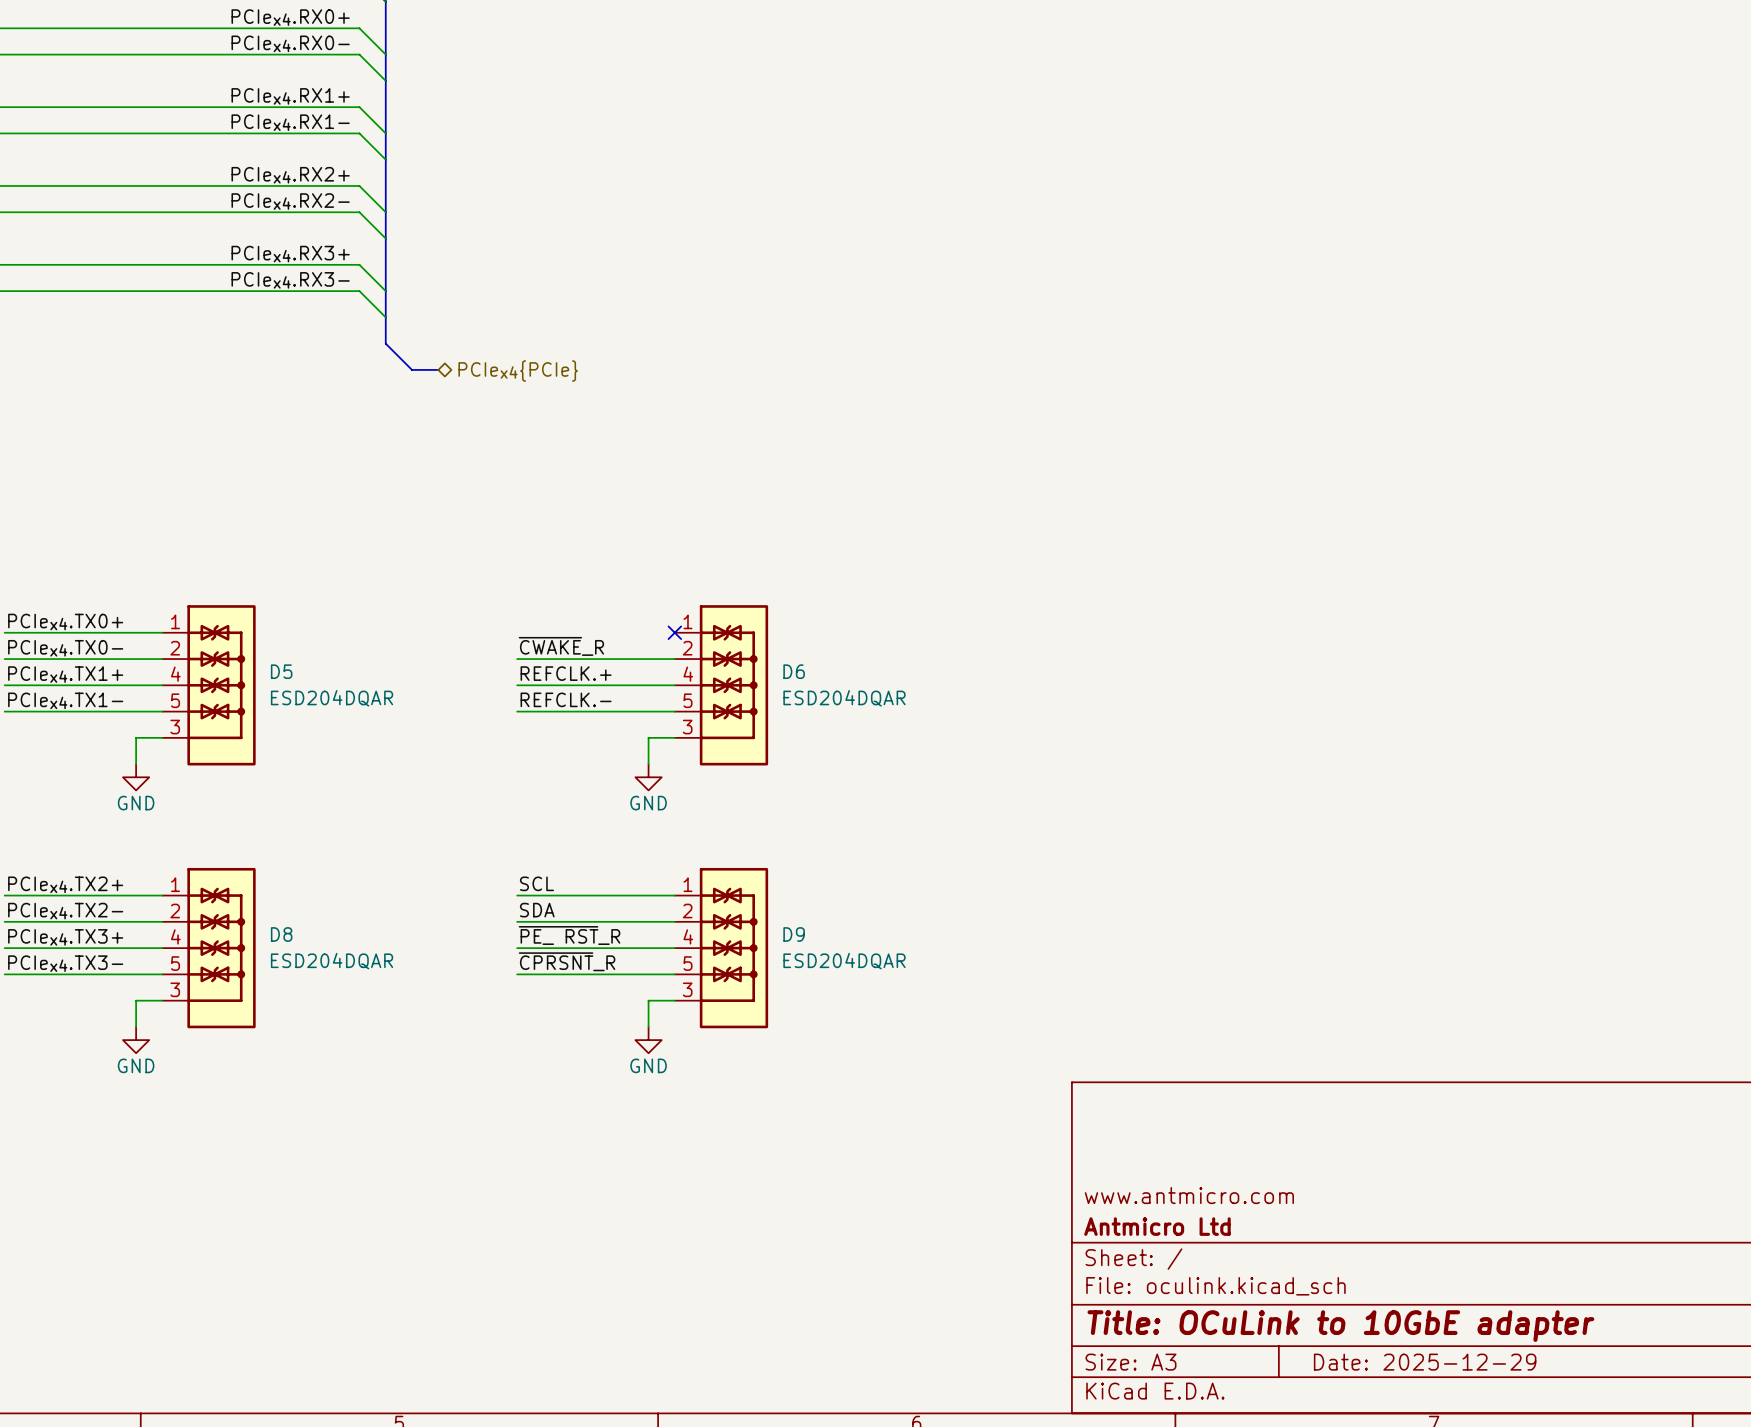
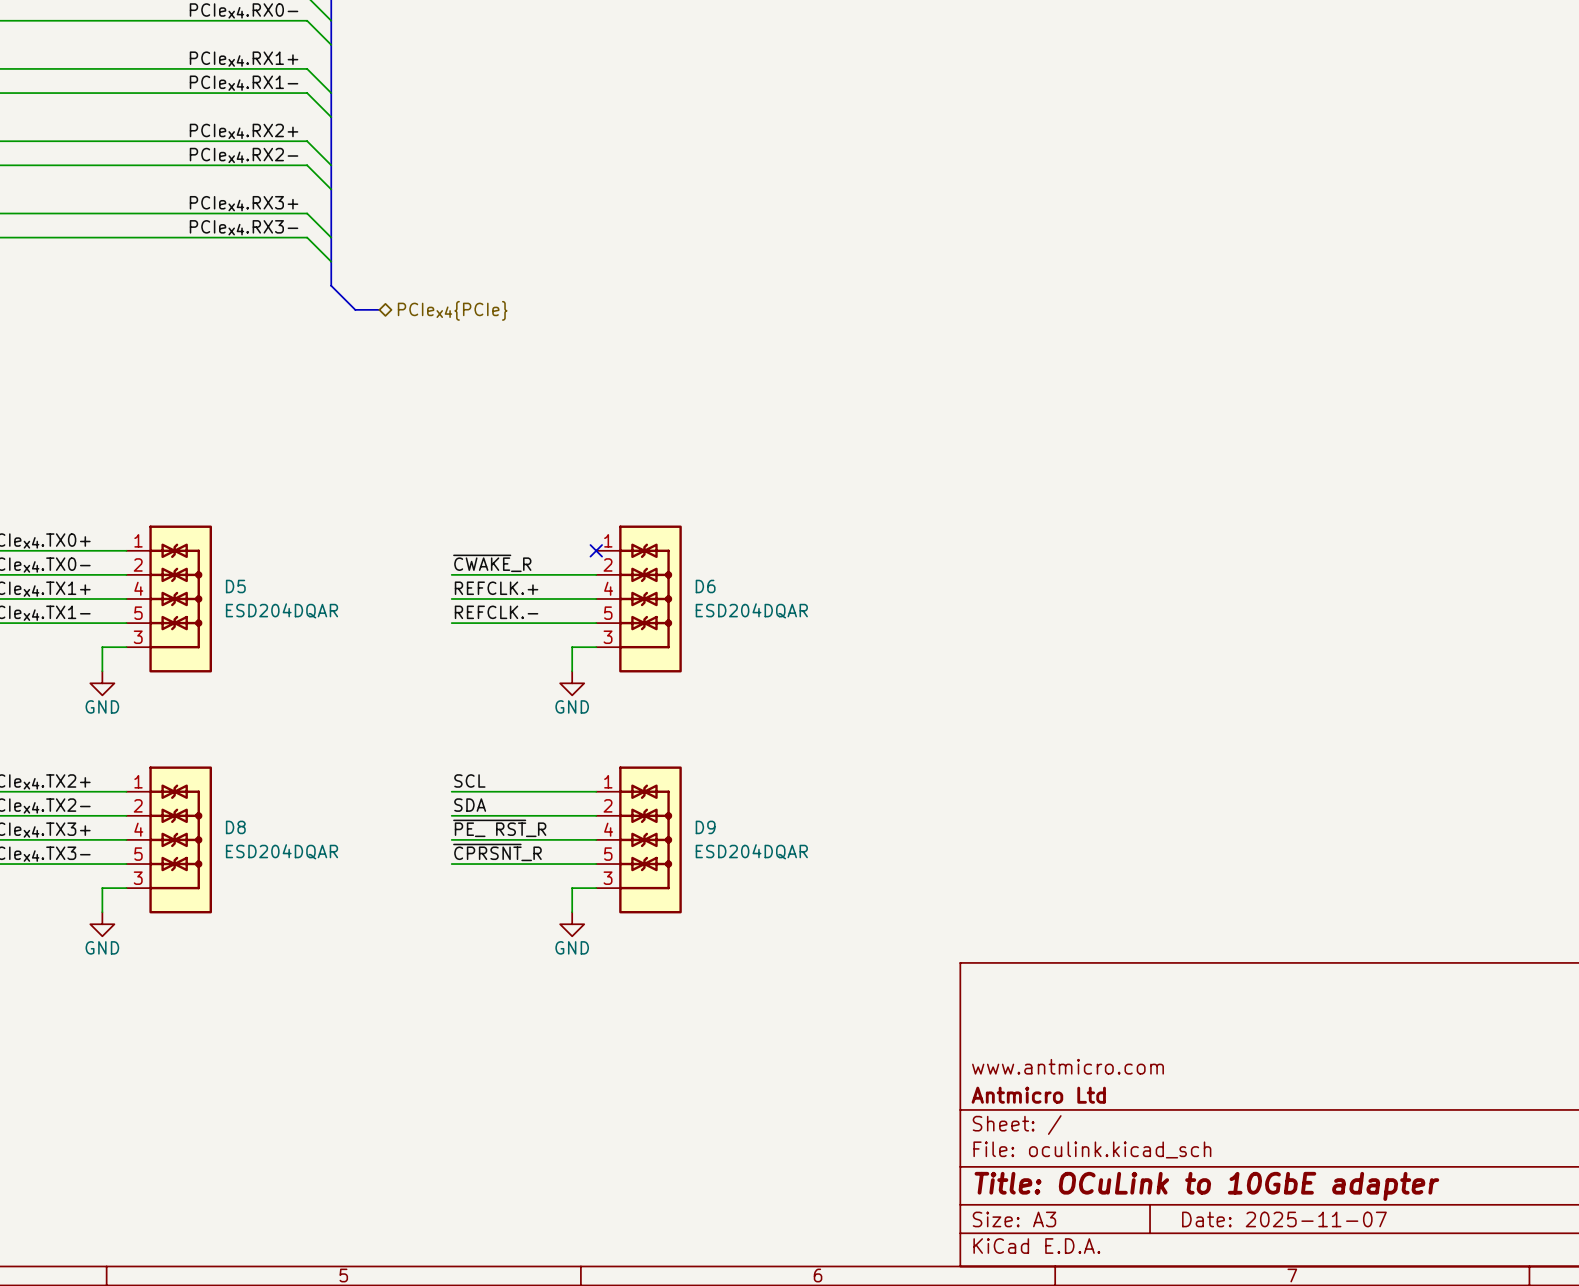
title block: Date: 2025-12-29 (1425, 1362) -> Date: 2025-11-07 (1284, 1219)

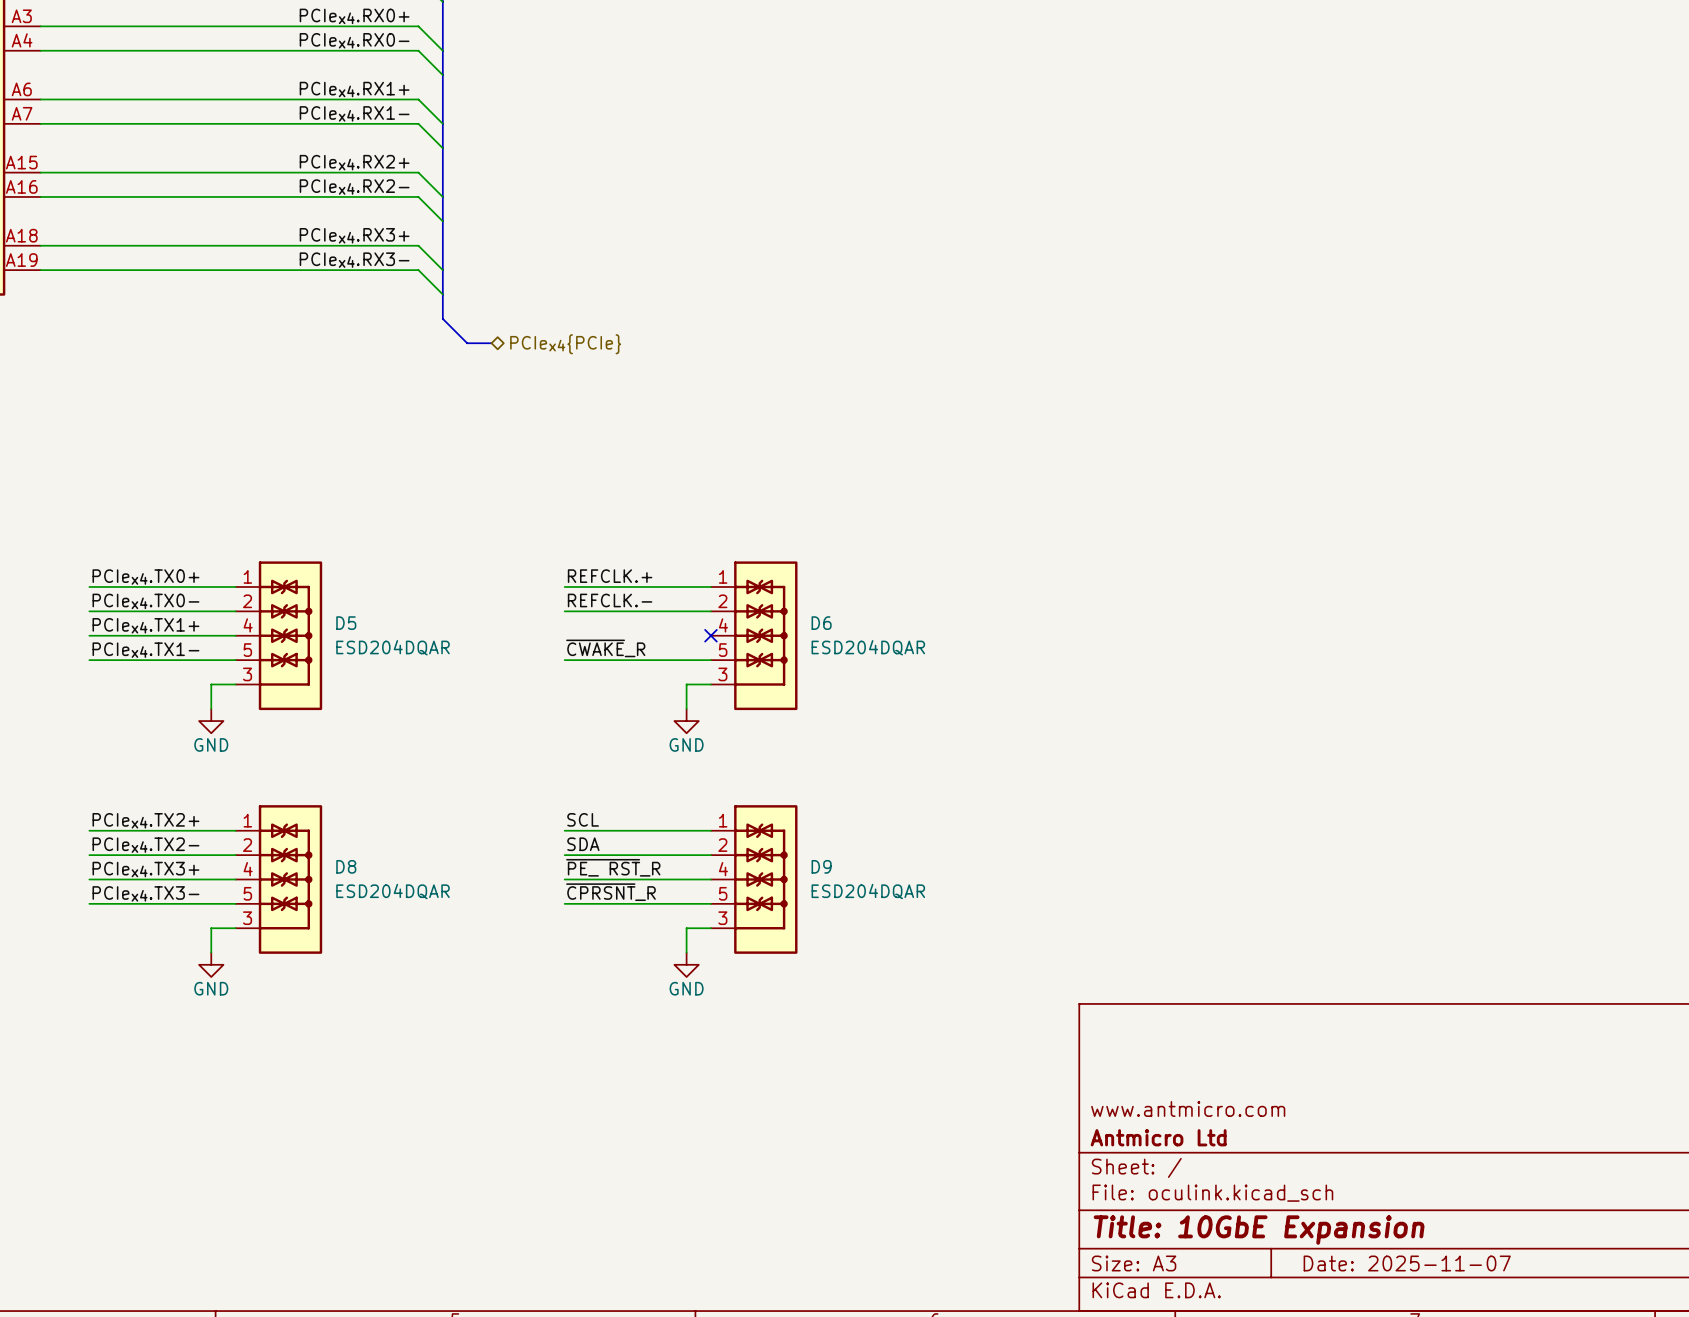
no-connect mark position: (596, 550) -> (710, 635)
label: ~{CWAKE}_R (492, 563) -> REFCLK.- (610, 600)
label position: REFCLK.+ (496, 588) -> REFCLK.+ (610, 576)
wire: (451, 598) (596, 598) -> (564, 586) (710, 586)
label: REFCLK.- (496, 612) -> ~{CWAKE}_R (605, 648)
title block: Title: OCuLink to 10GbE adapter (1206, 1186) -> Title: 10GbE Expansion (1259, 1230)

